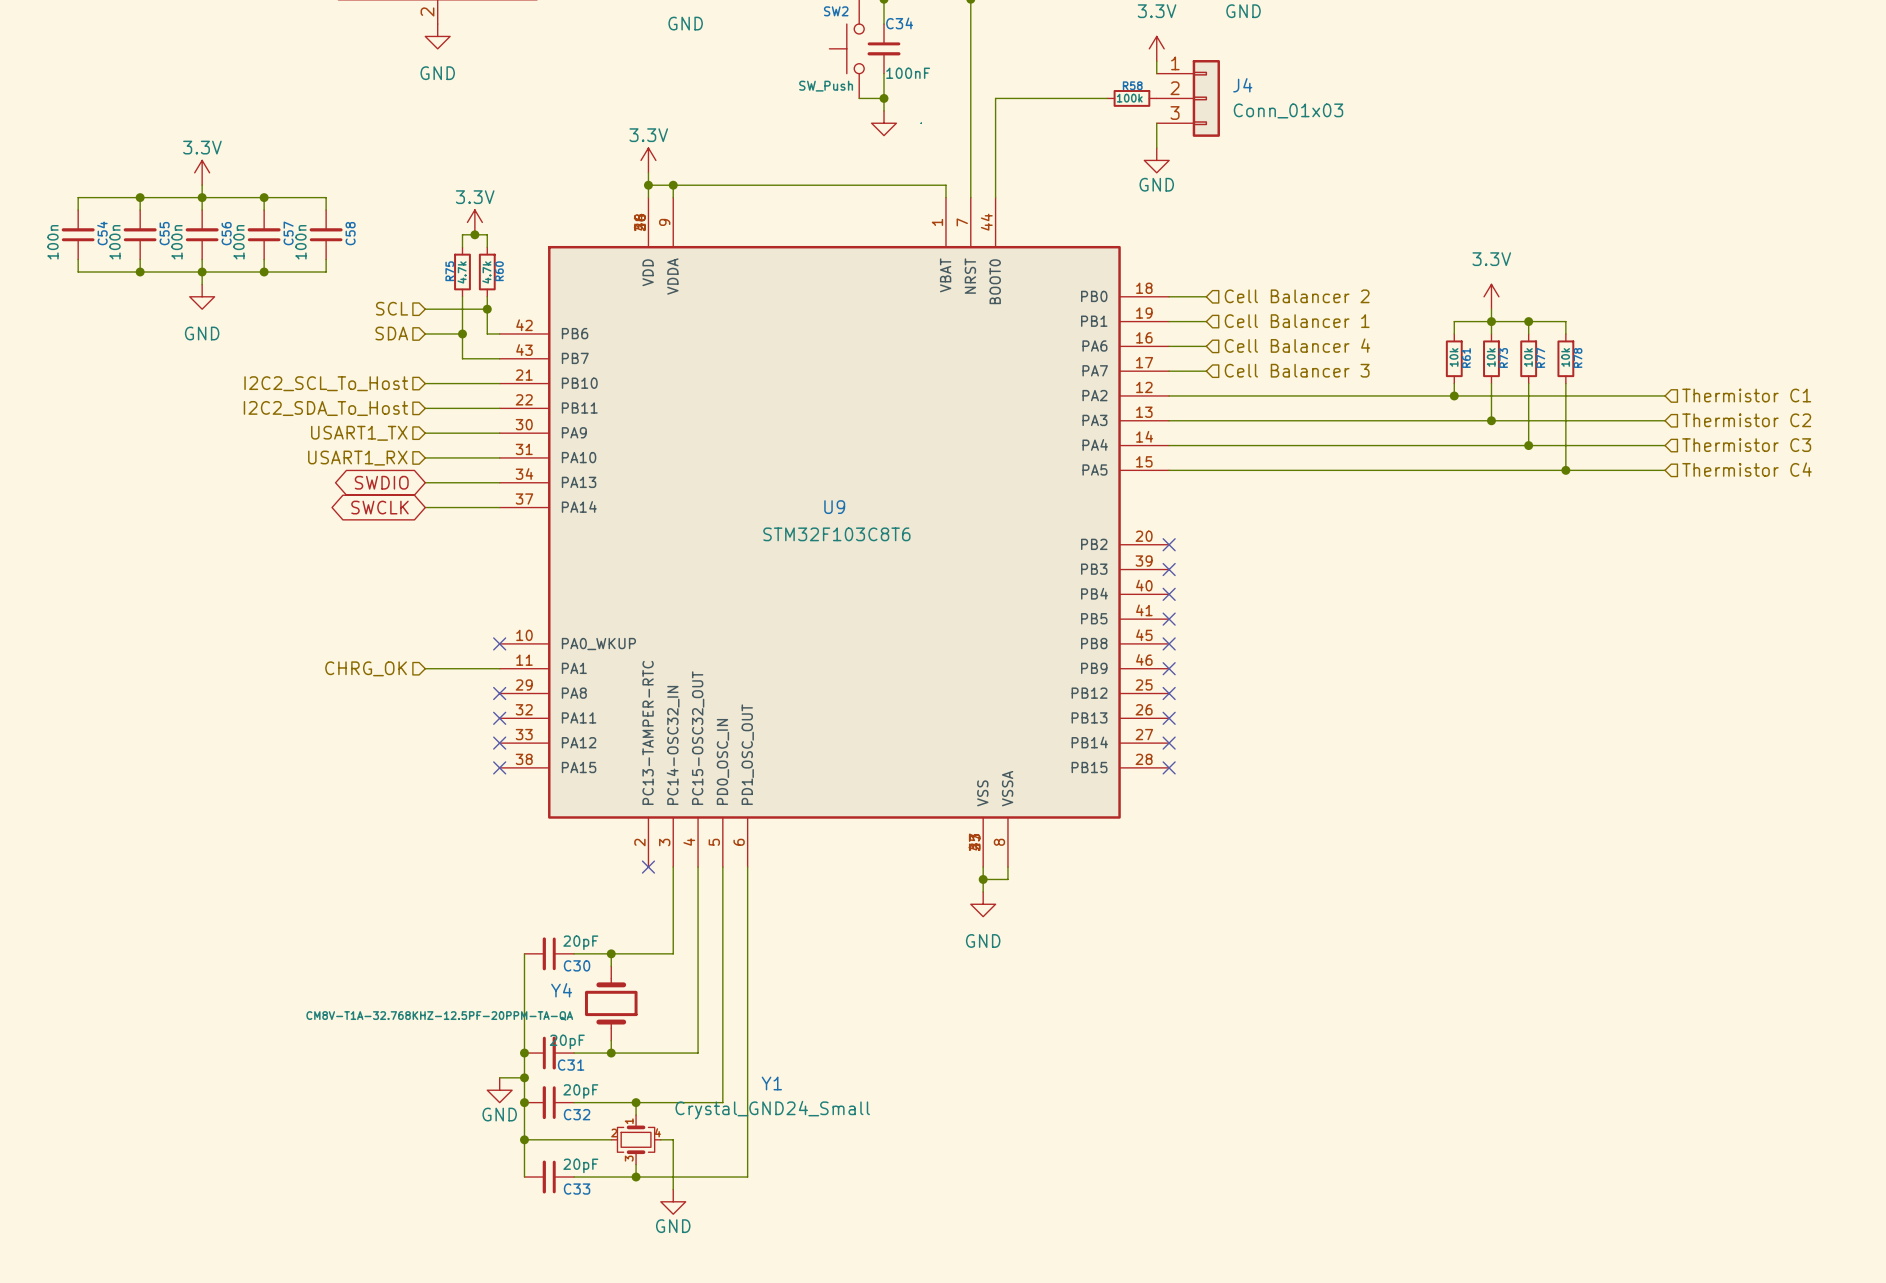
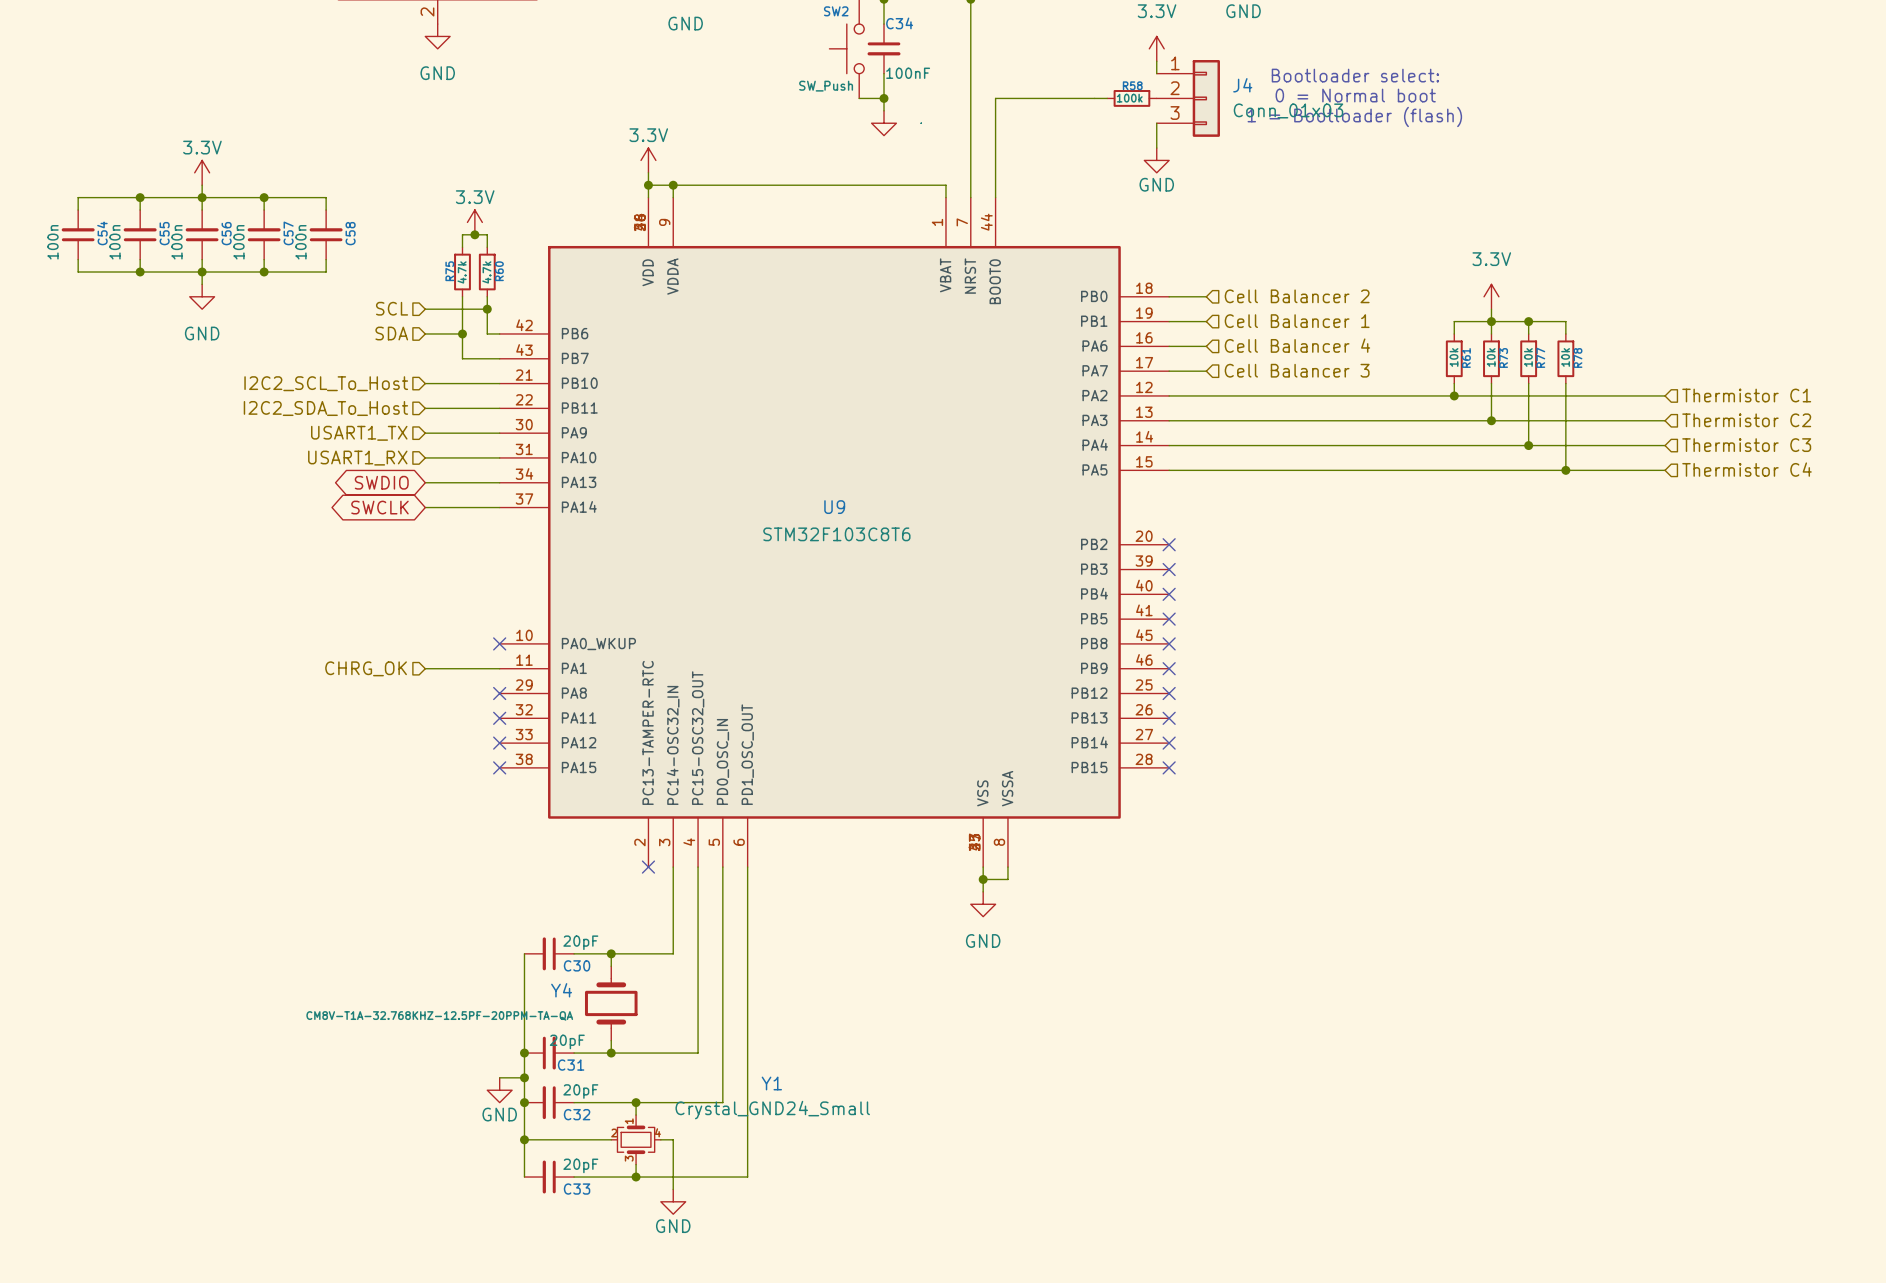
text: none -> Bootloader select: (1355, 75)
text: none -> 0 = Normal boot (1355, 95)
text: none -> 1 = Bootloader (flash) (1354, 116)

